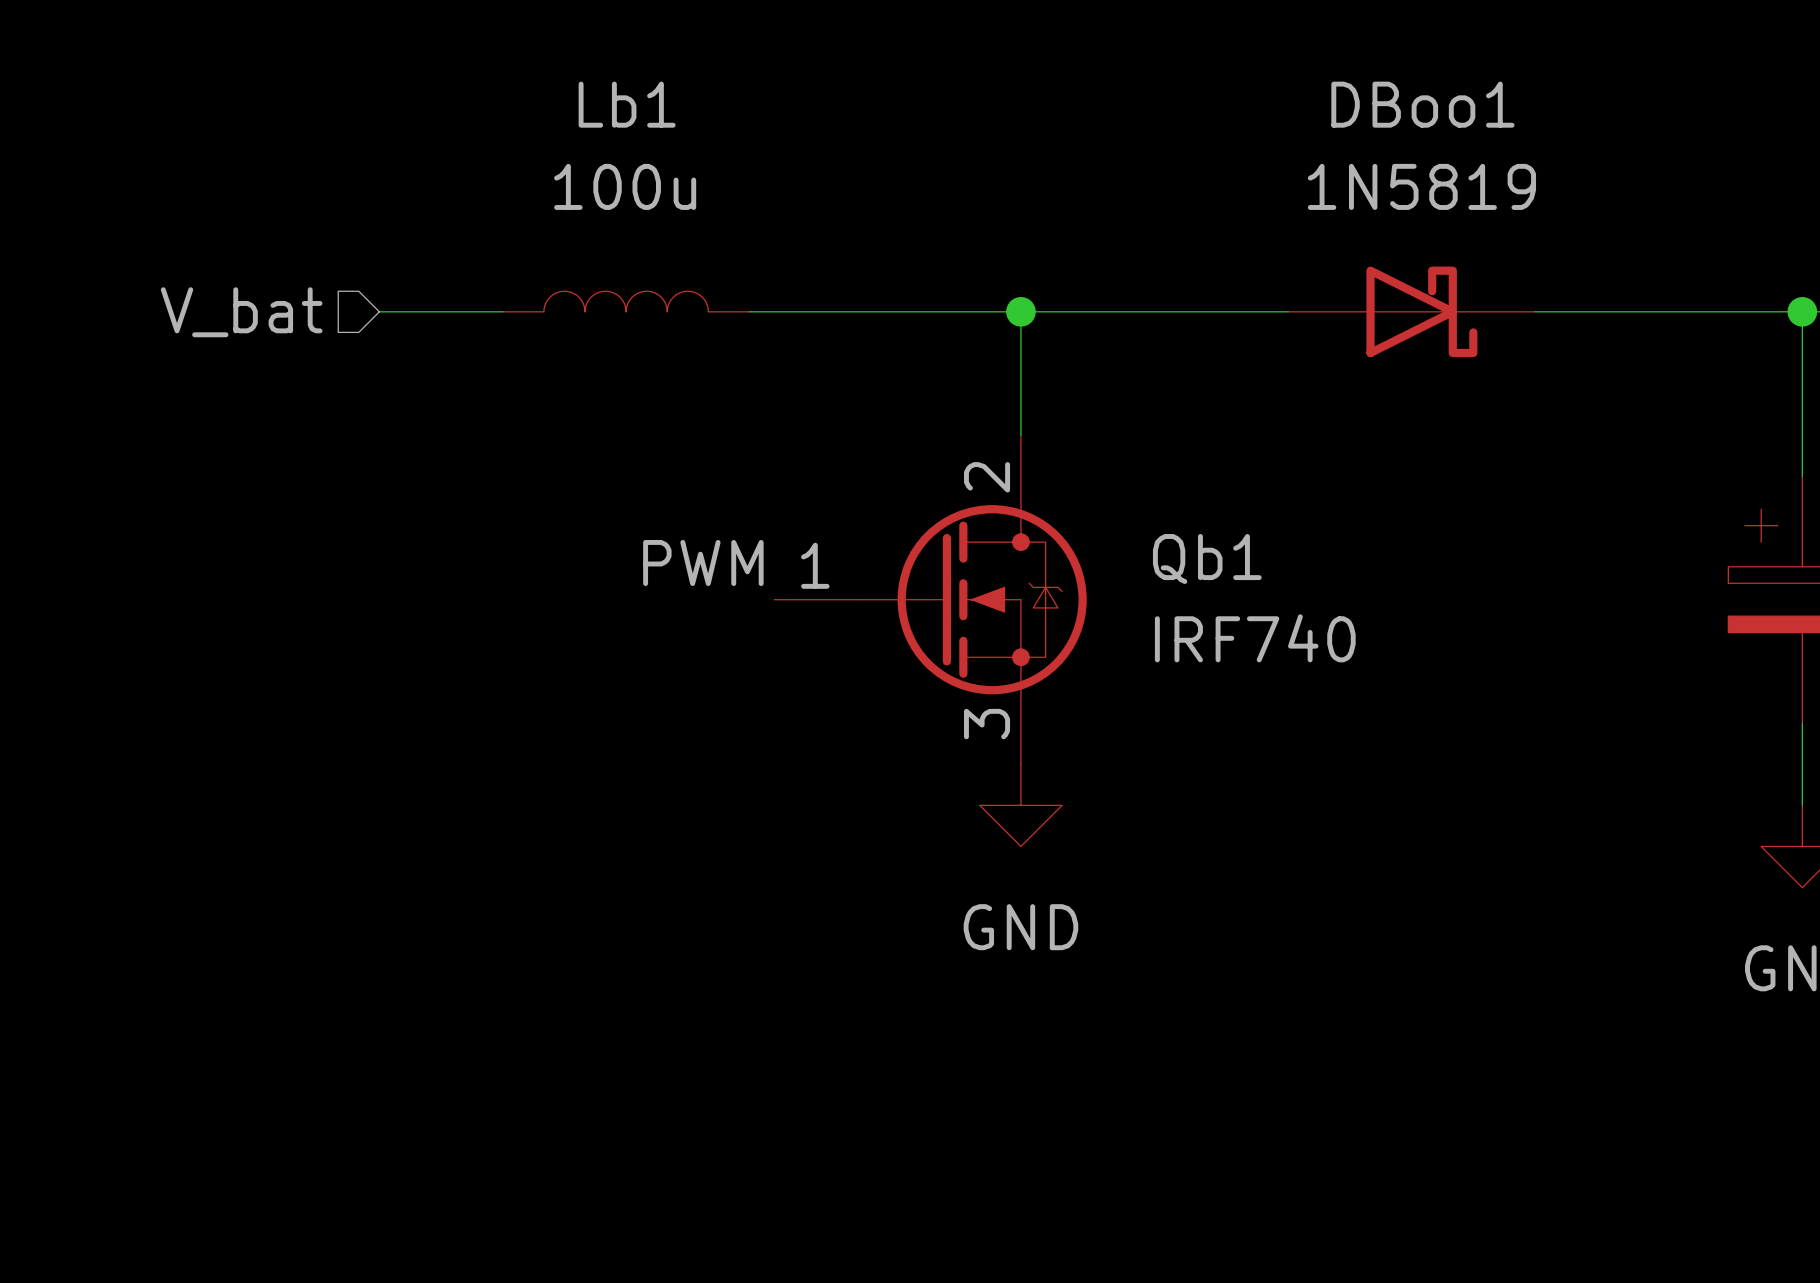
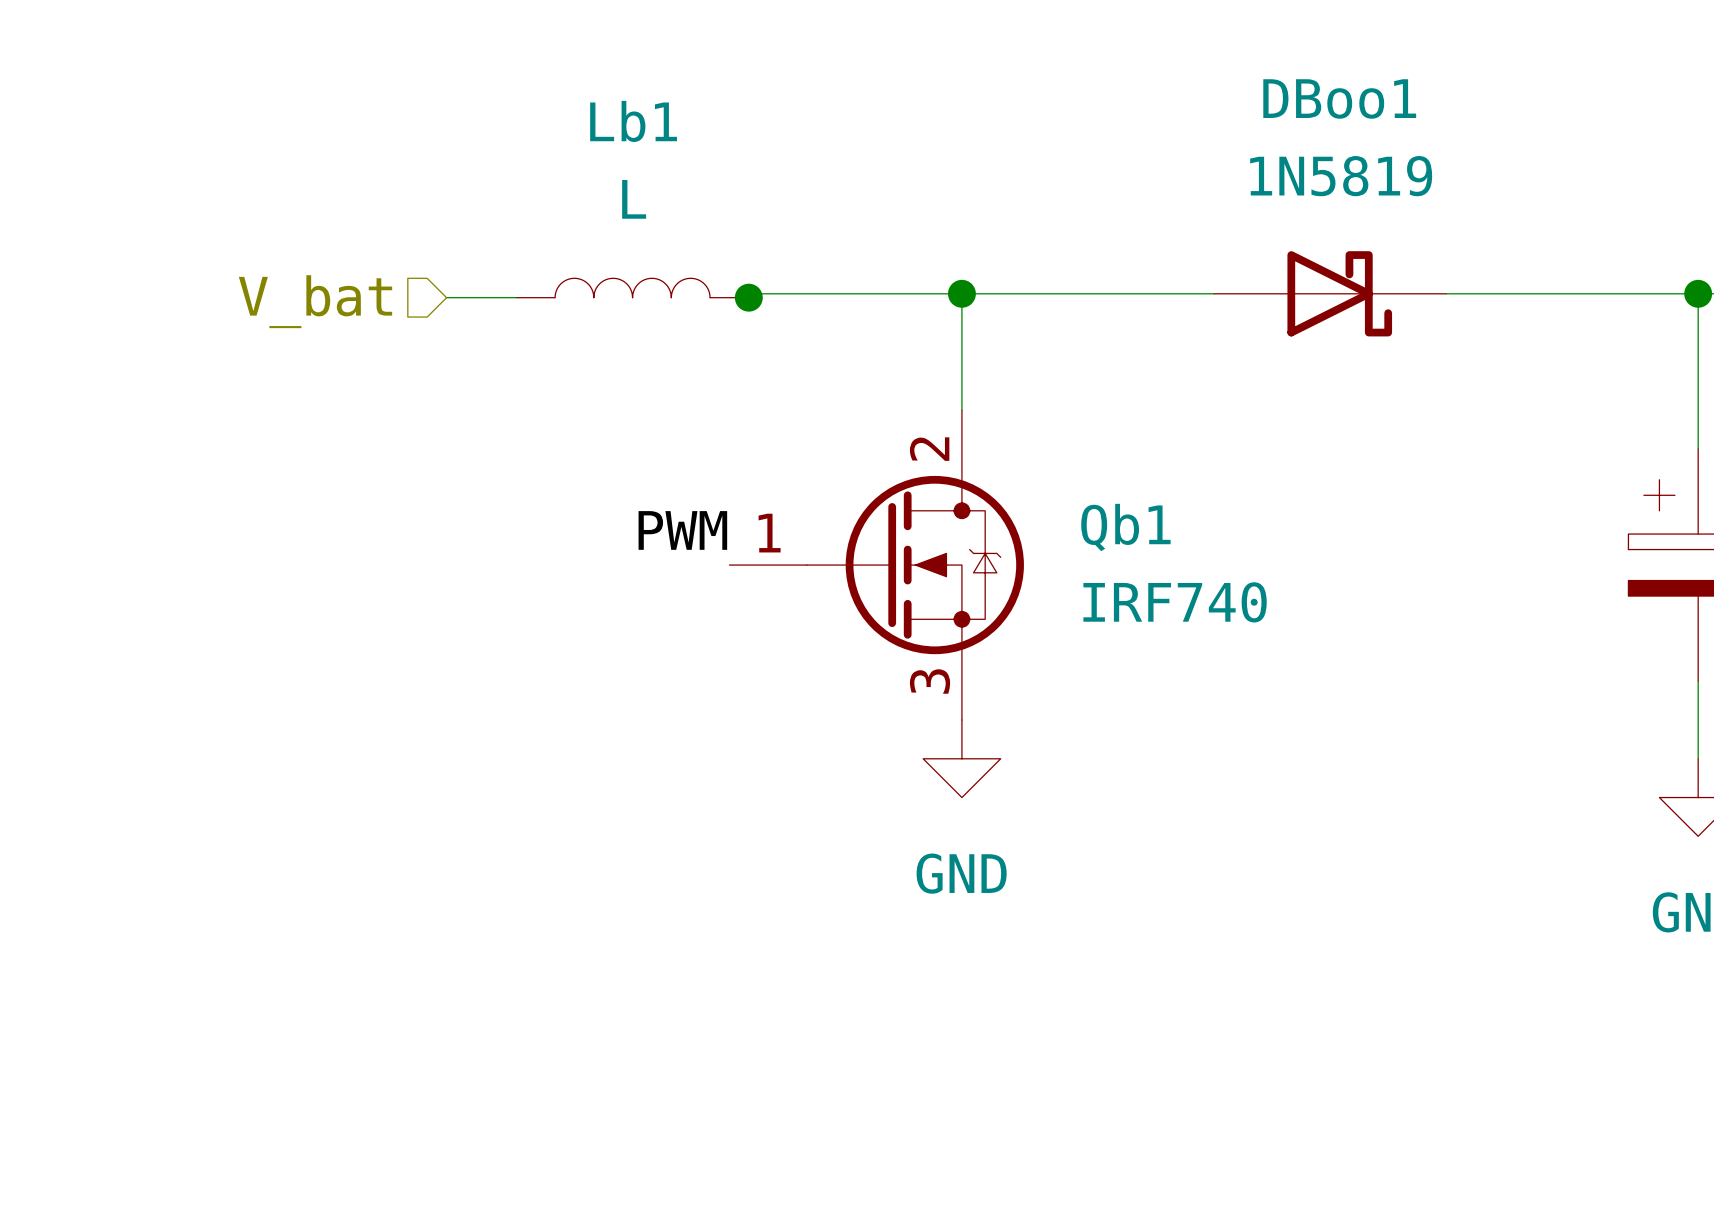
Lb1 name position: Lb1 (627, 104) -> Lb1 (633, 121)
Lb1 value: 100u (625, 186) -> L (634, 199)
Lb1 position: (626, 301) -> (632, 287)
wire: (379, 311) (502, 311) -> none
wire: (749, 311) (794, 311) -> none
hierarchical label position: V_bat (241, 312) -> V_bat (315, 301)
wire: none -> (446, 297) (516, 297)
junction: none -> (748, 297)

